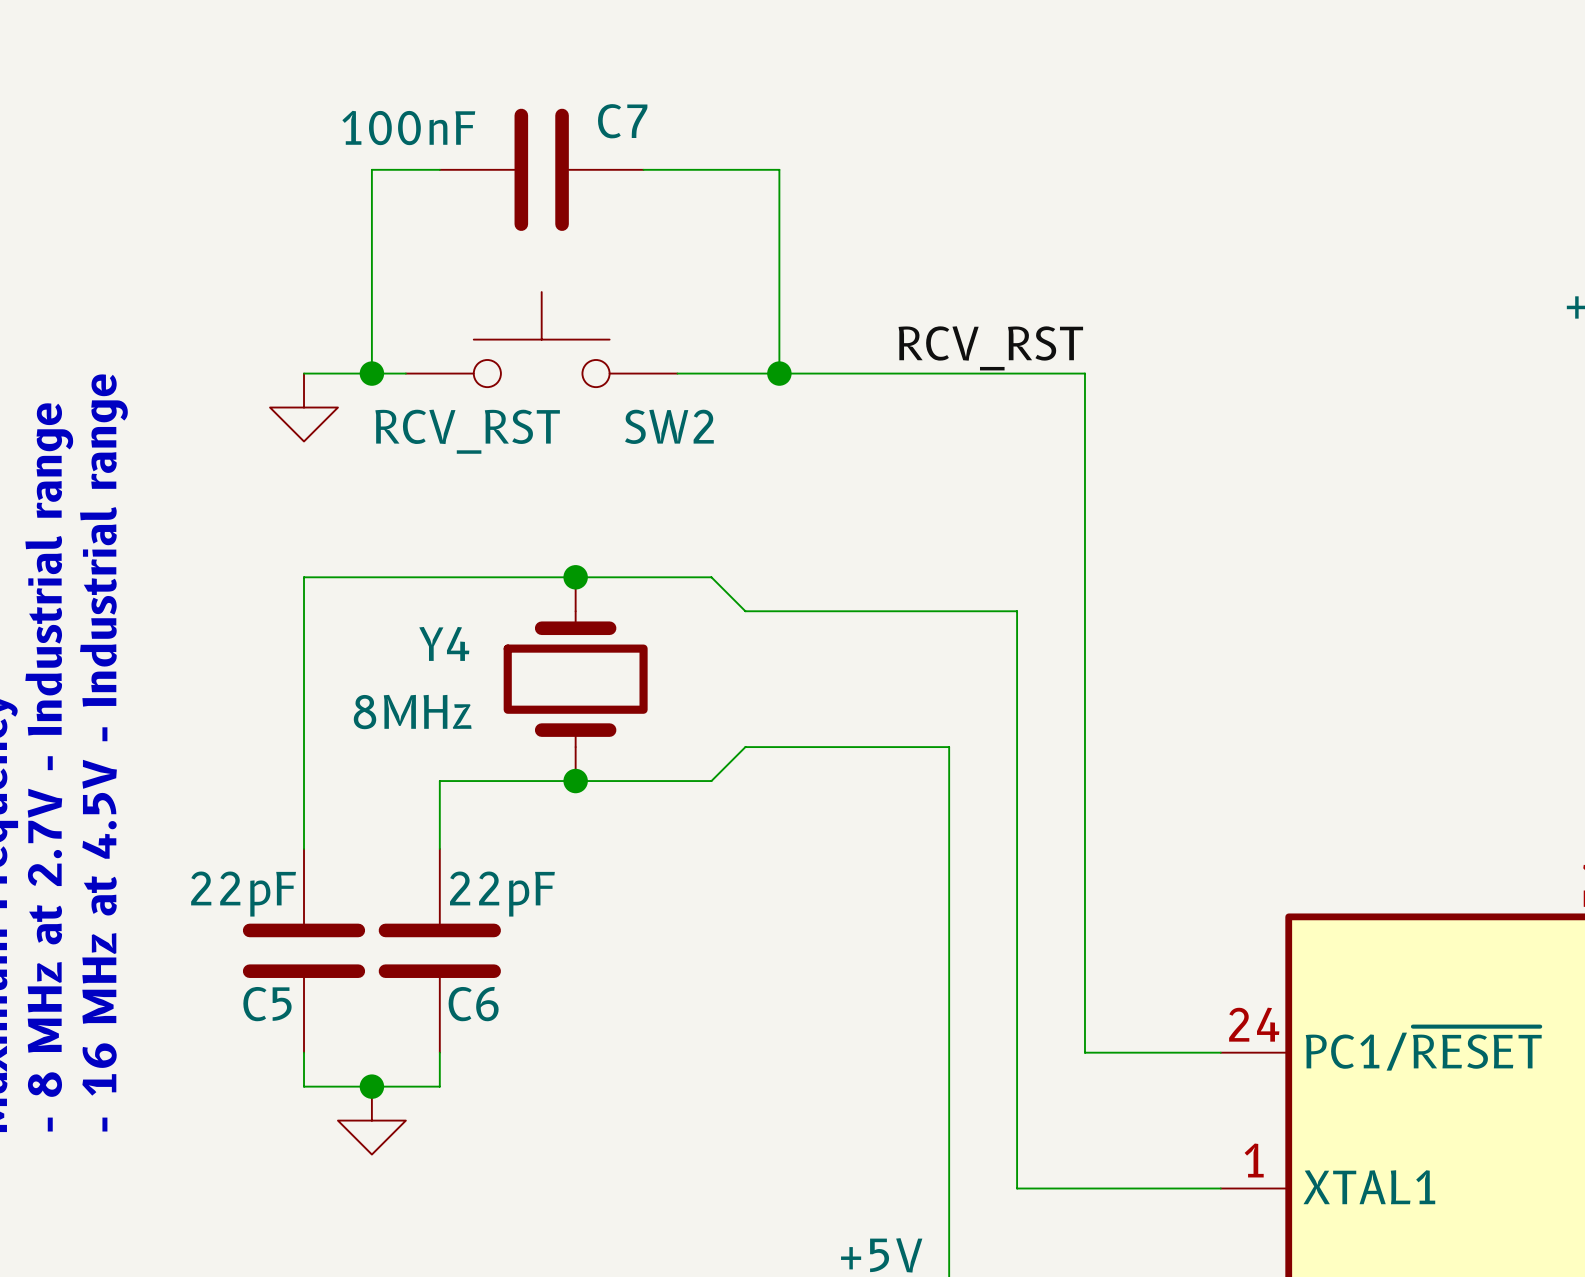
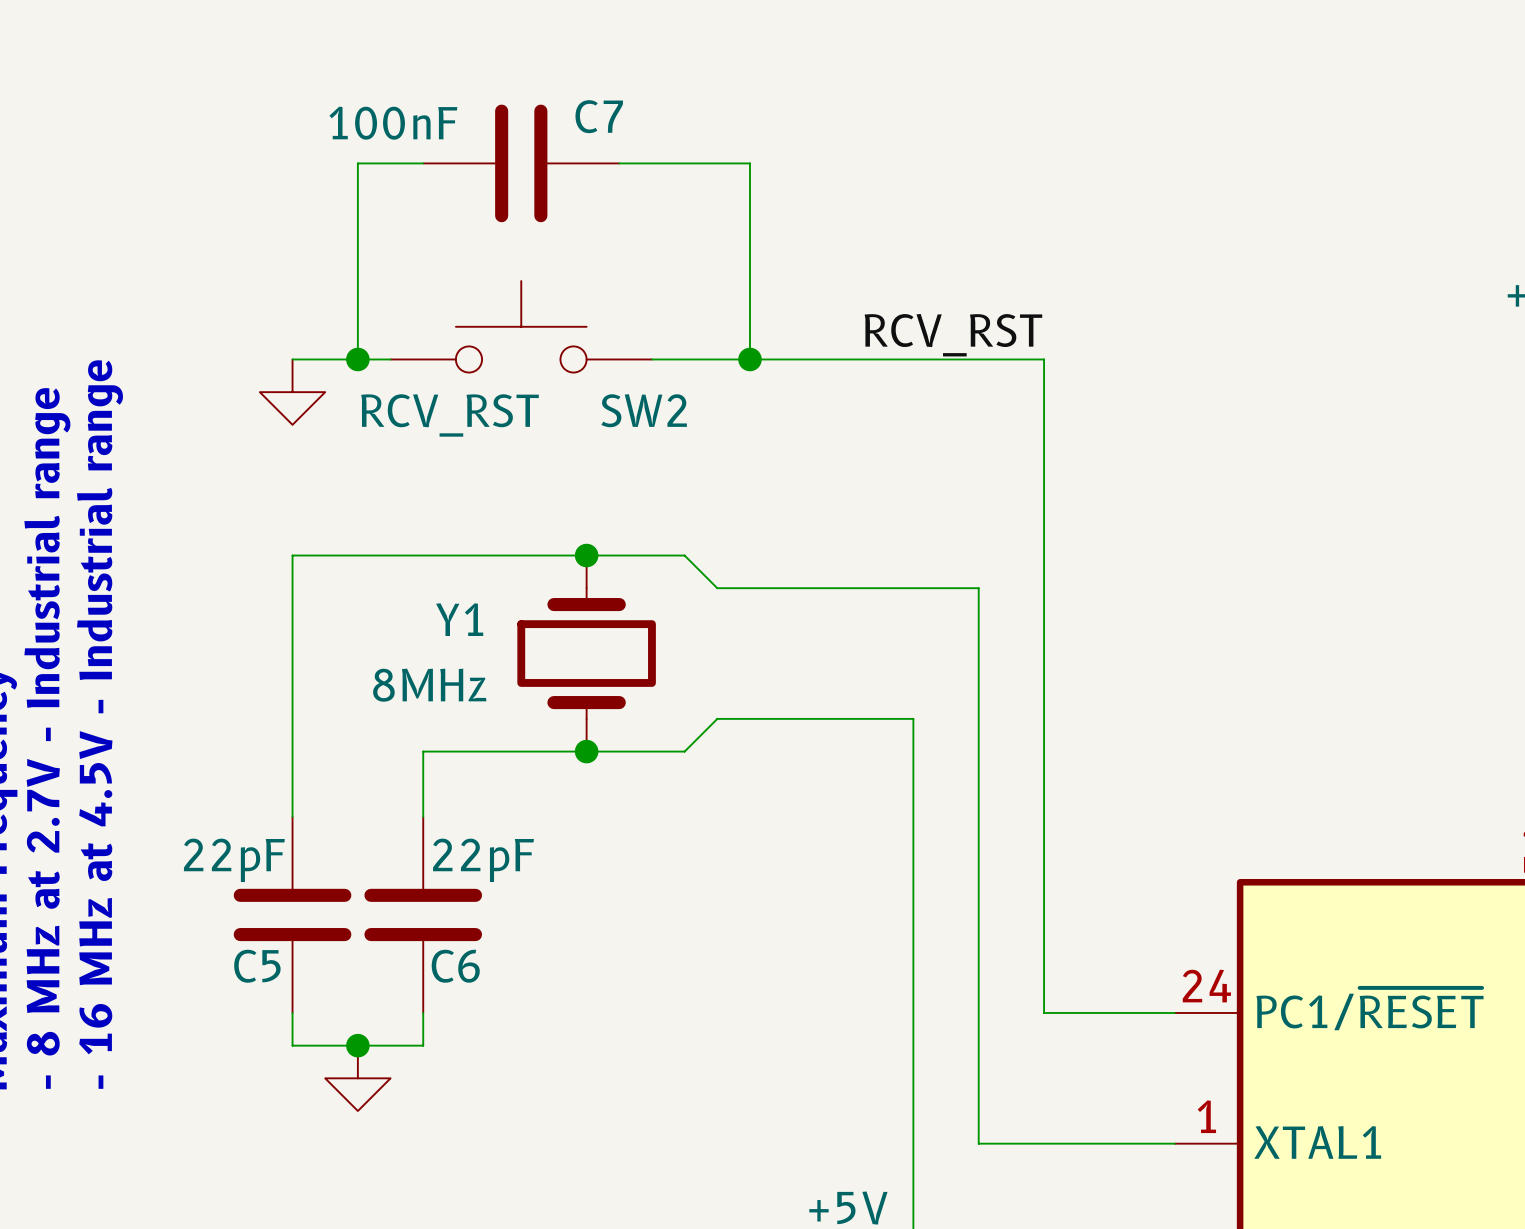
junction position: (575, 577) -> (586, 555)
Y4: 8MHz (575, 679) -> none
Y1: none -> 8MHz (586, 653)
junction position: (575, 781) -> (586, 751)

